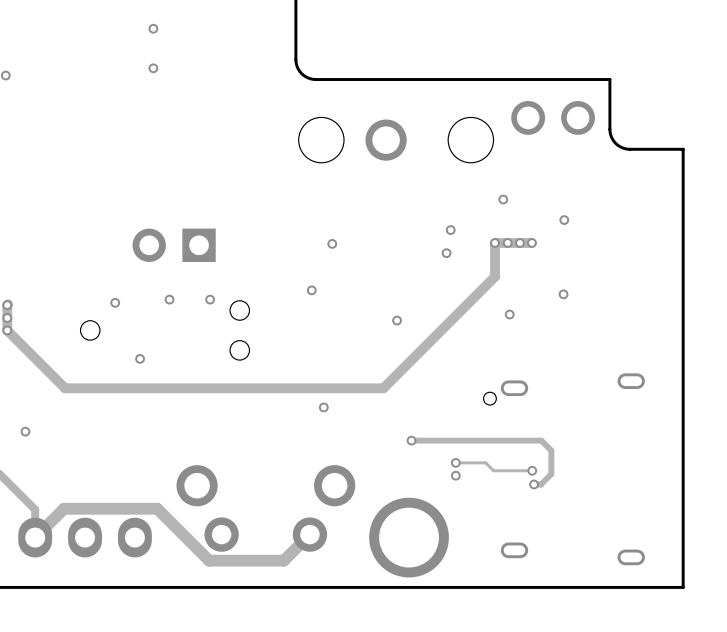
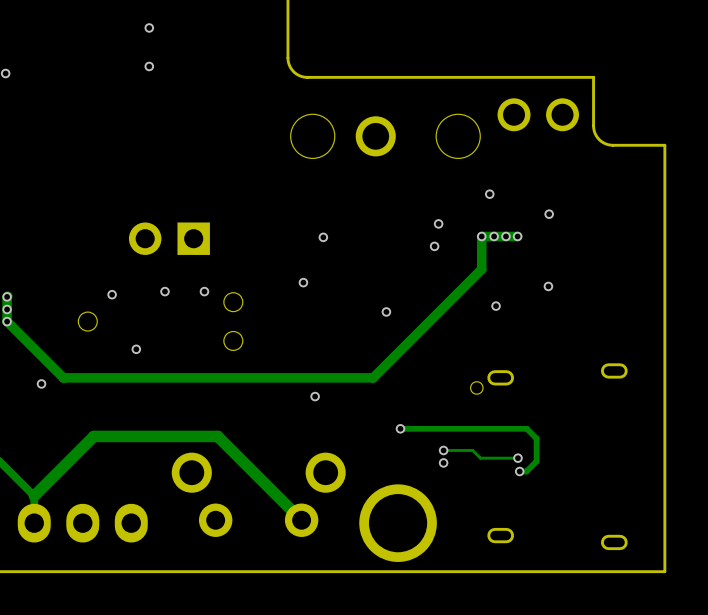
via position: (25, 431) -> (41, 383)
track: (309, 534) (283, 560) (209, 560) (157, 508) (64, 508) (35, 537) -> (301, 520) (217, 436) (93, 436) (34, 495)

